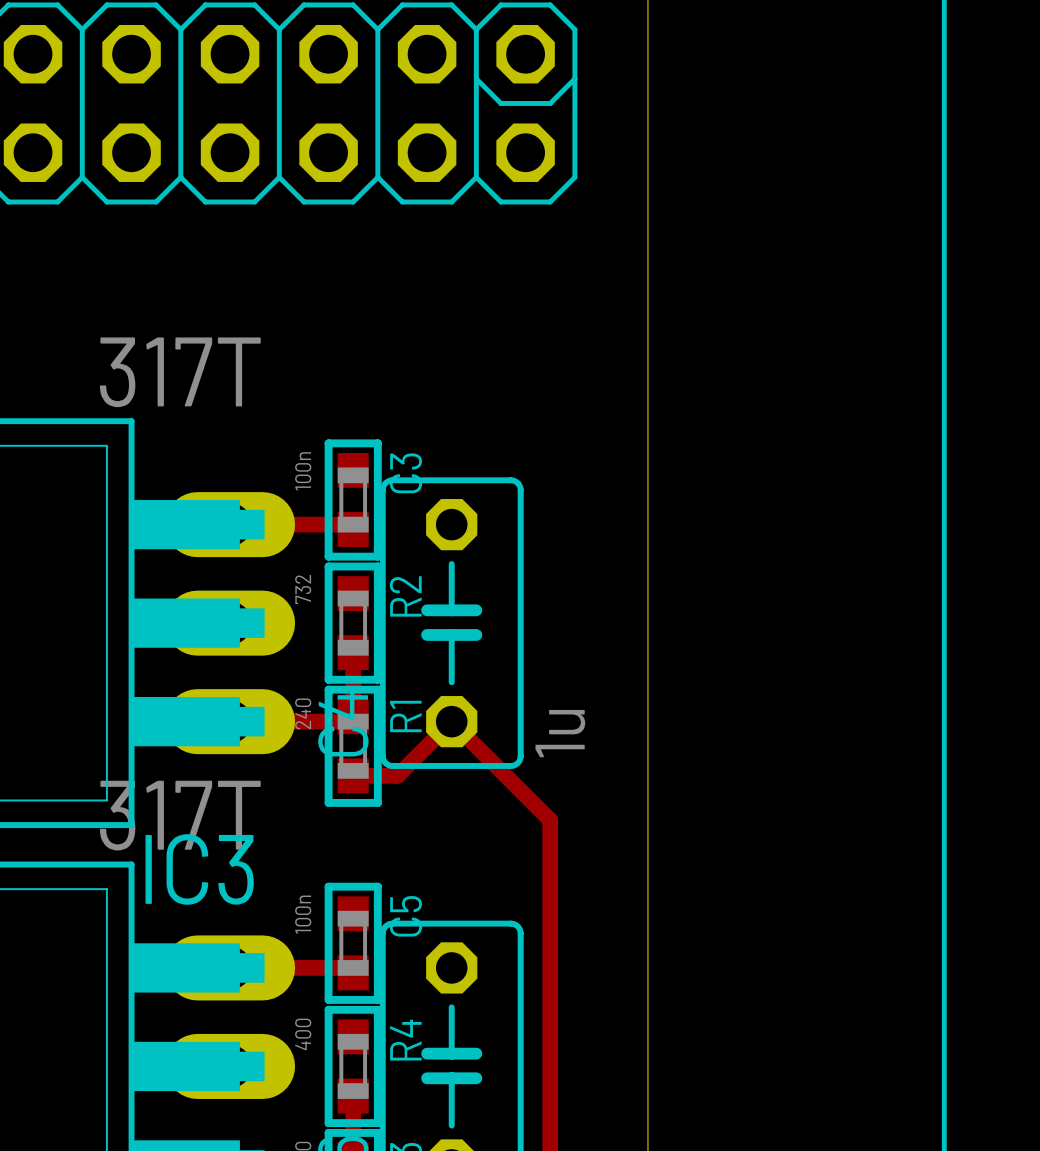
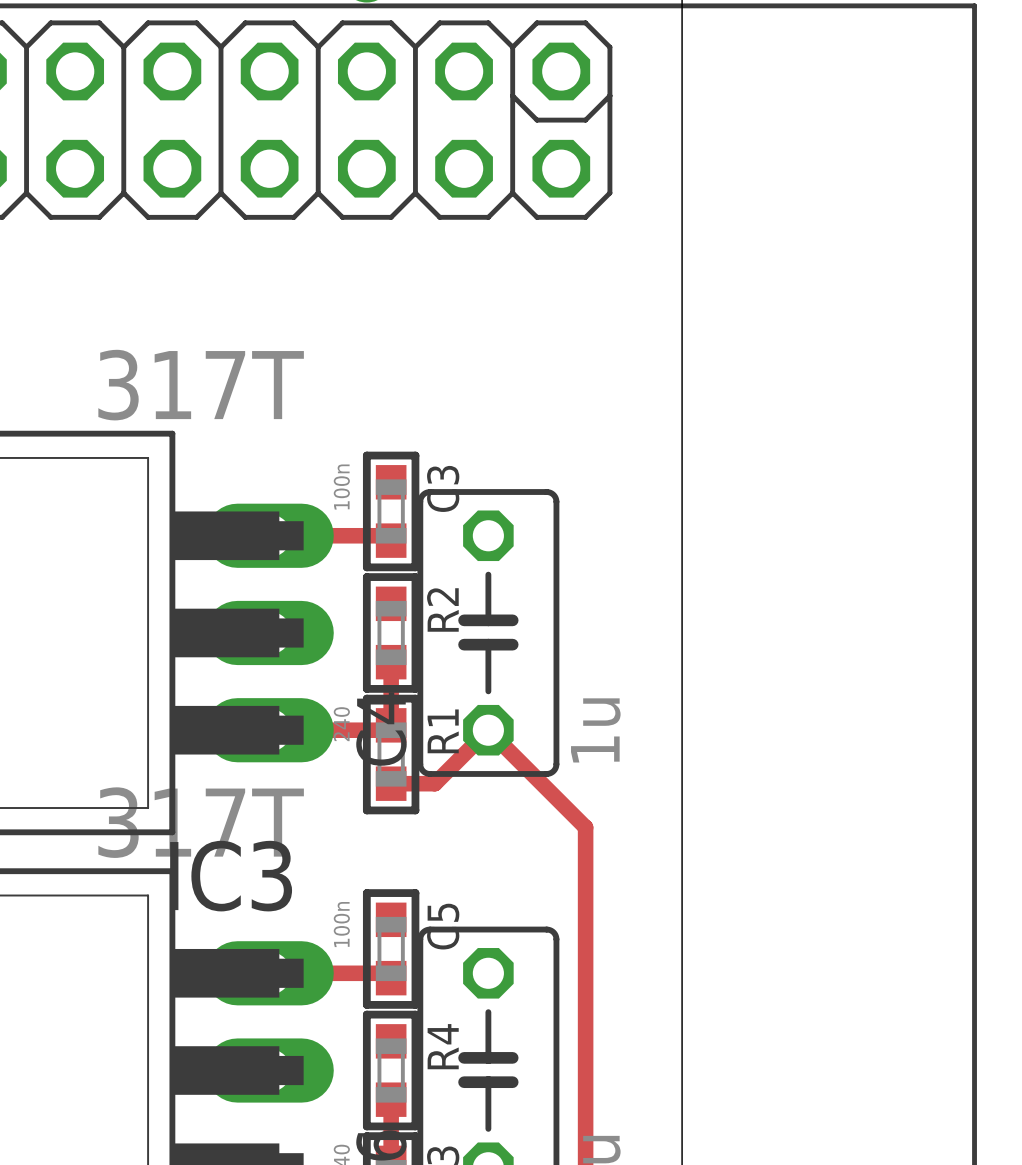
R2 value: 732 (303, 589) -> none
R4 value: 400 (303, 1034) -> none

